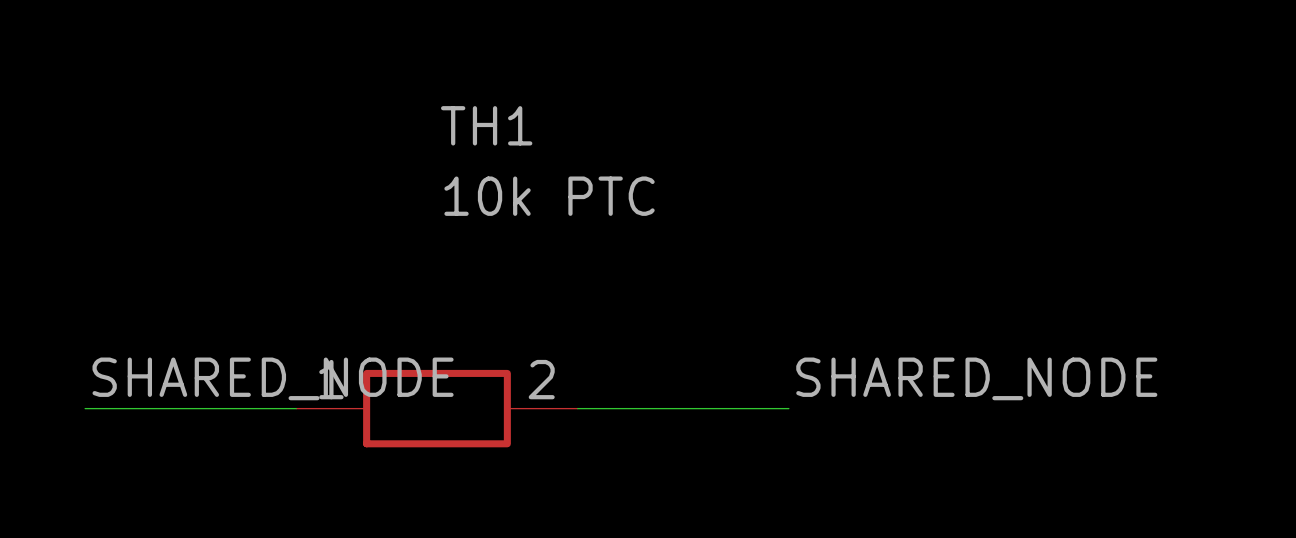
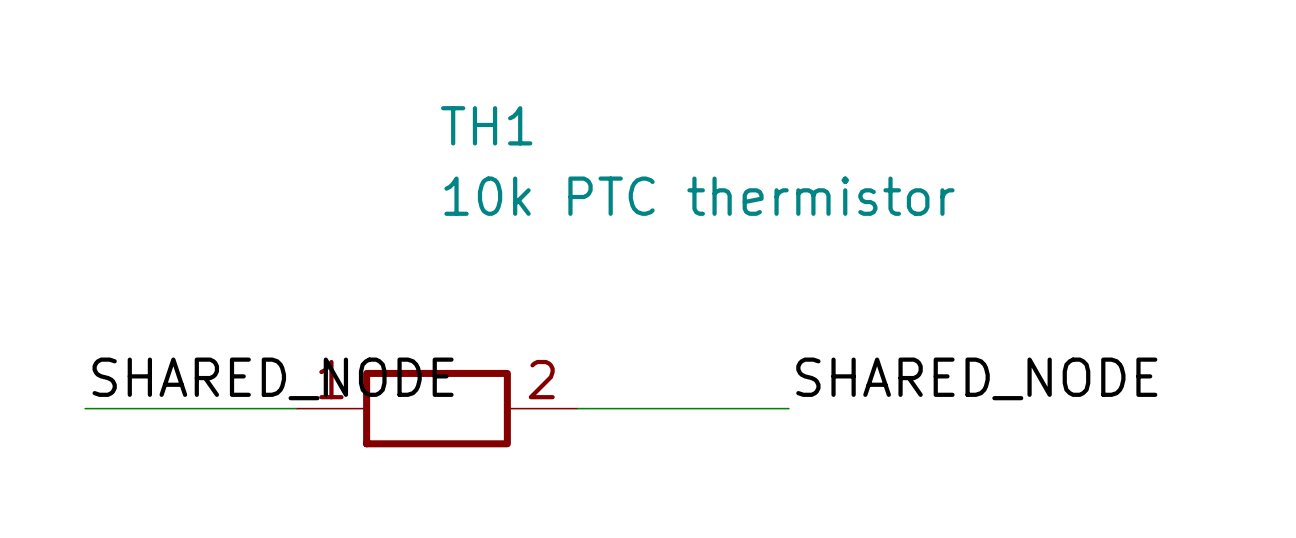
TH1 value: 10k PTC (549, 196) -> 10k PTC thermistor (699, 196)

